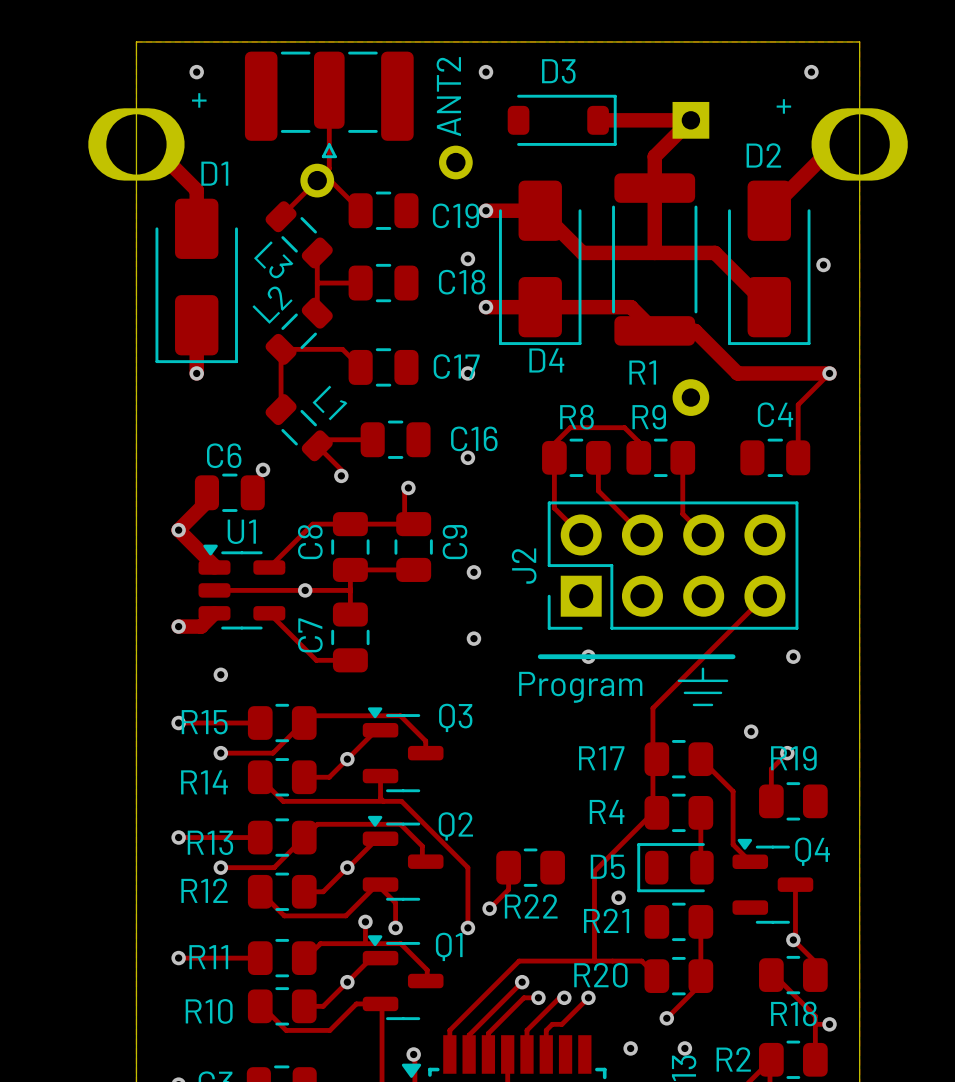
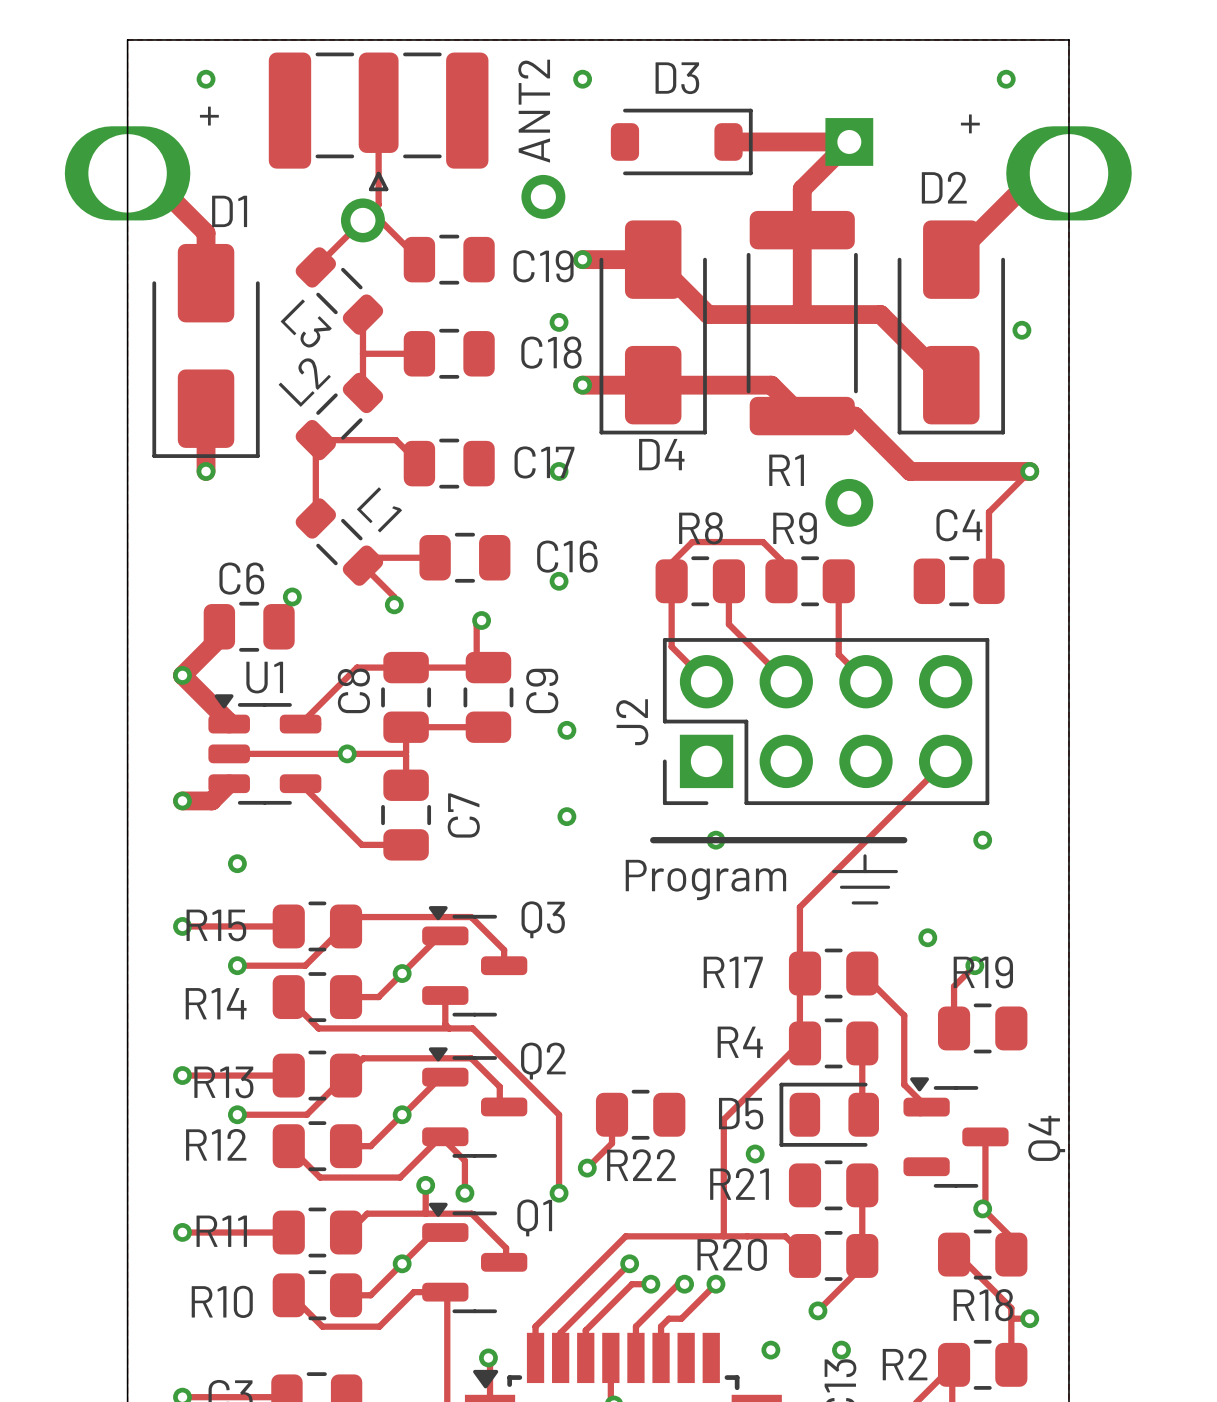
C7 name position: C7 (310, 635) -> C7 (463, 815)
Q4 name rotation: 0° (812, 851) -> 90° counterclockwise (1046, 1138)

